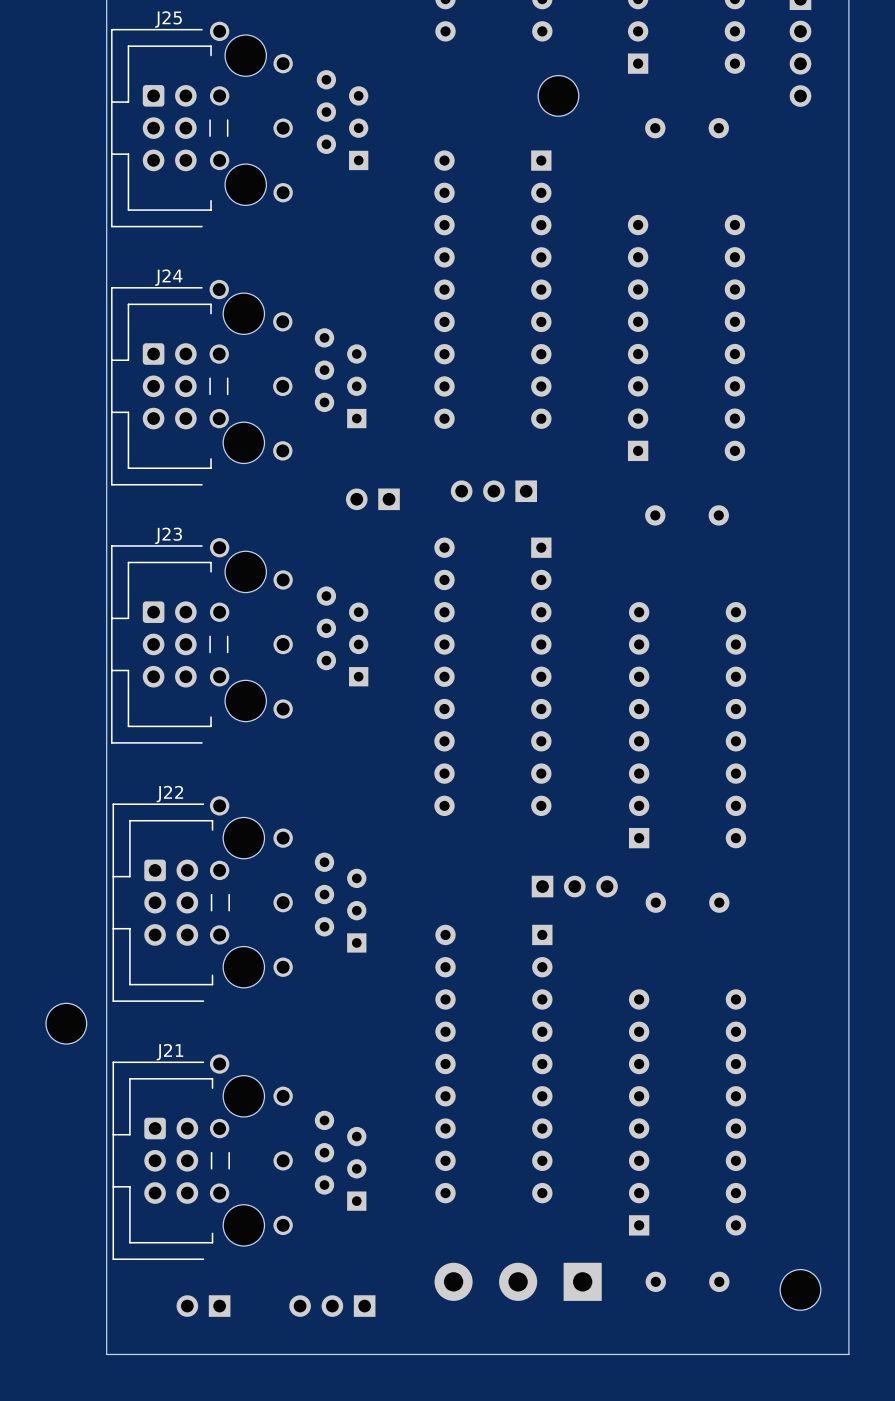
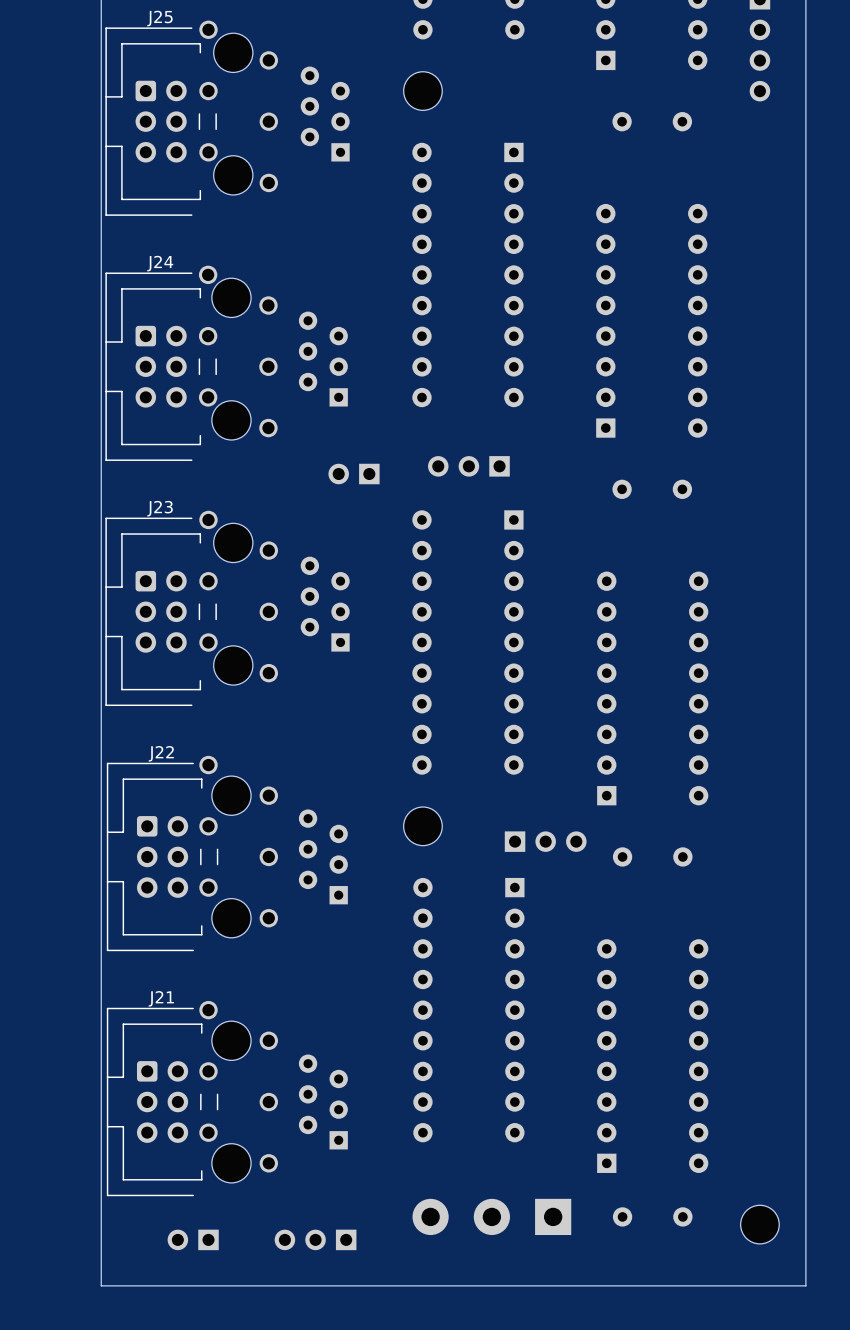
part position: (558, 95) -> (422, 91)
part: none -> (422, 826)
part: (66, 1023) -> none

